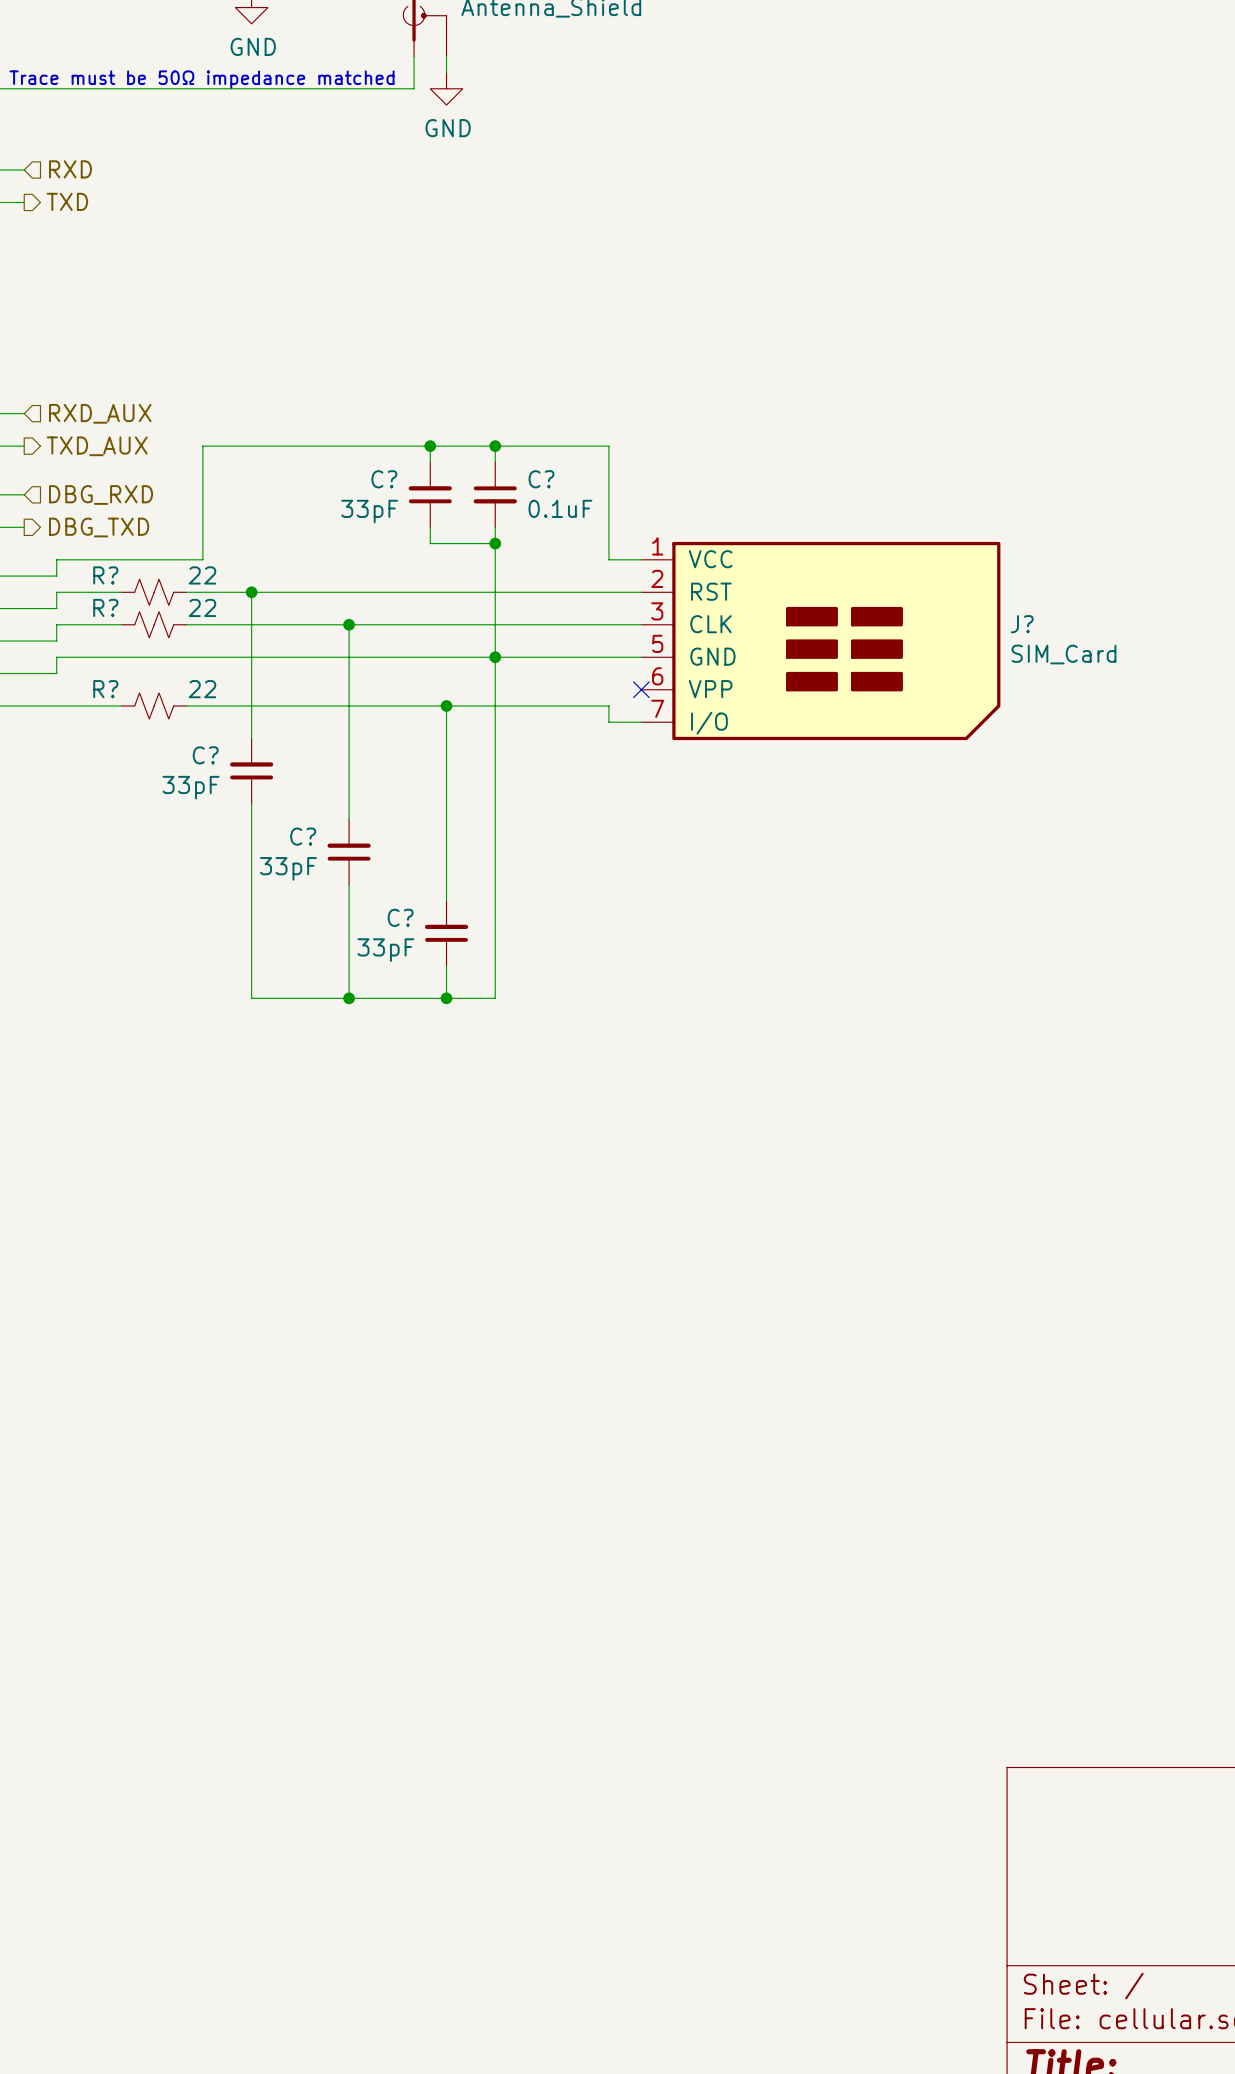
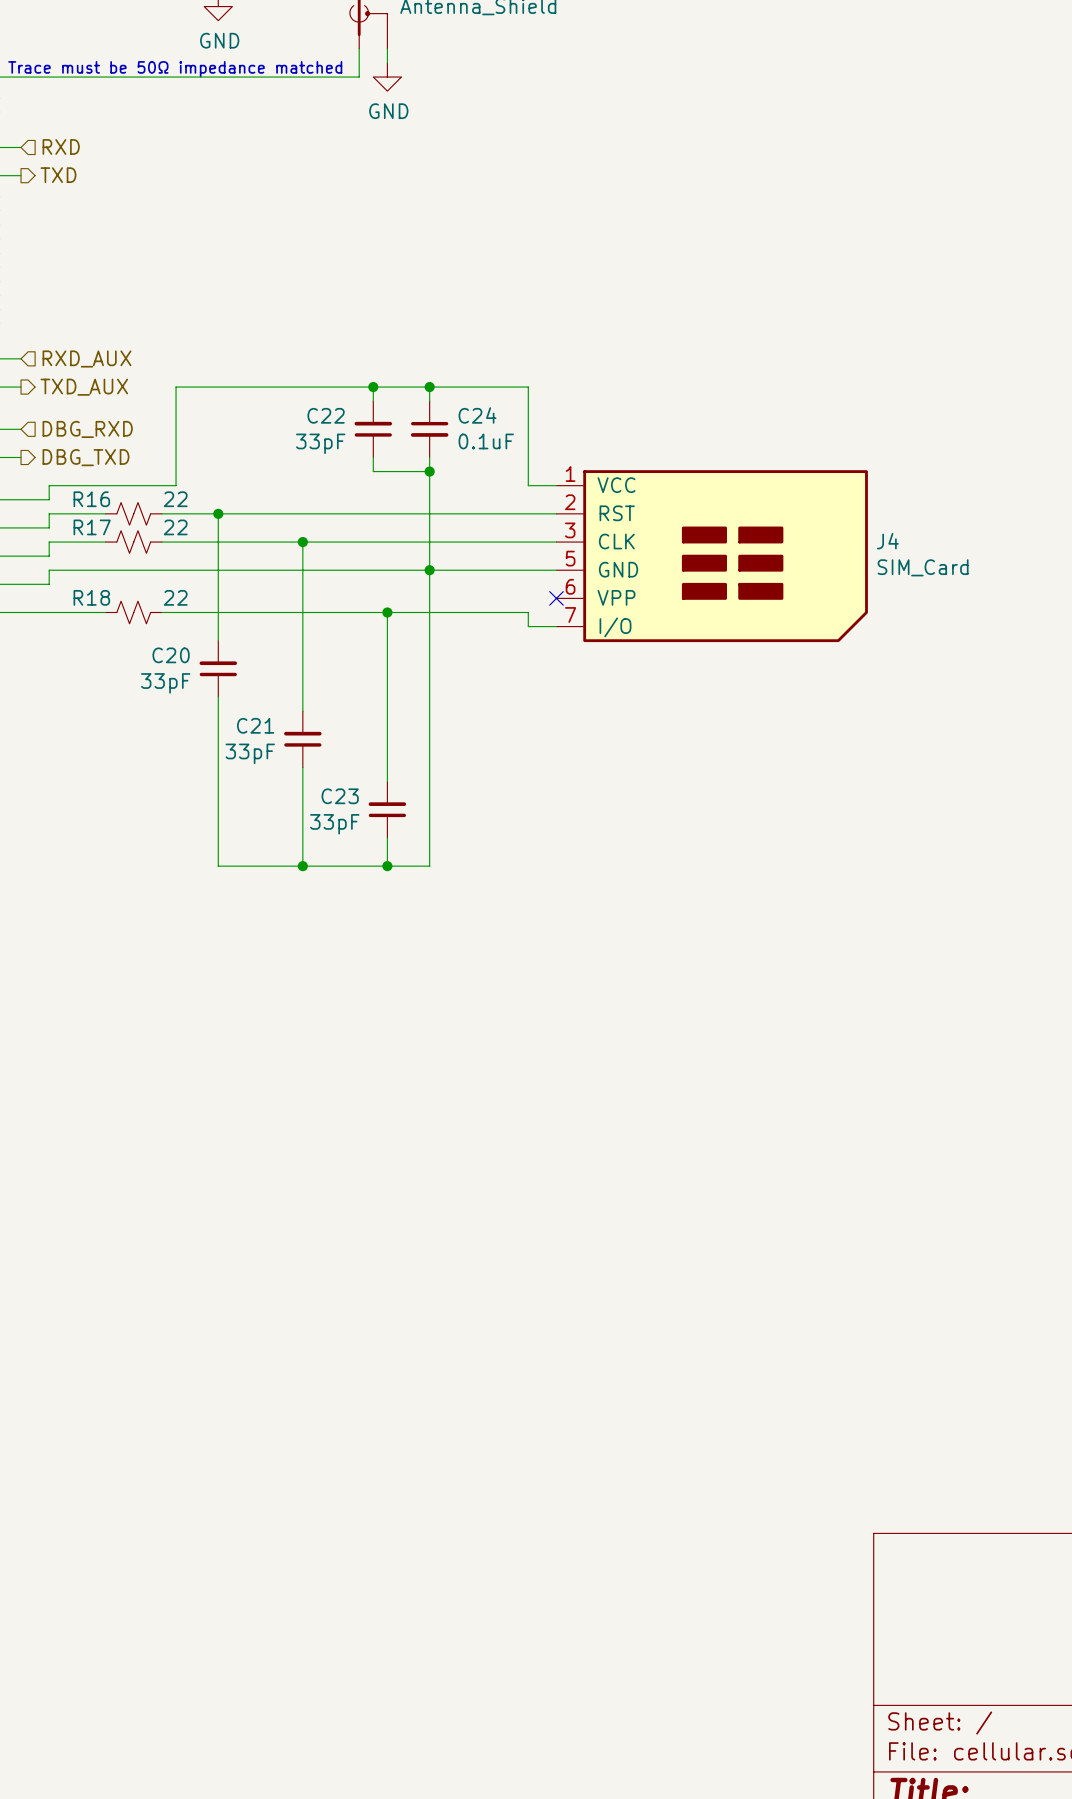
C? name: C? (384, 479) -> C22 (326, 415)
C? name: C? (541, 479) -> C24 (477, 415)
R? name: R? (105, 575) -> R16 (91, 499)
R? name: R? (105, 607) -> R17 (92, 527)
J? name: J? (1022, 624) -> J4 (887, 541)
R? name: R? (105, 689) -> R18 (91, 597)
C? name: C? (205, 755) -> C20 (171, 655)
C? name: C? (303, 836) -> C21 (255, 725)
C? name: C? (400, 917) -> C23 (340, 796)

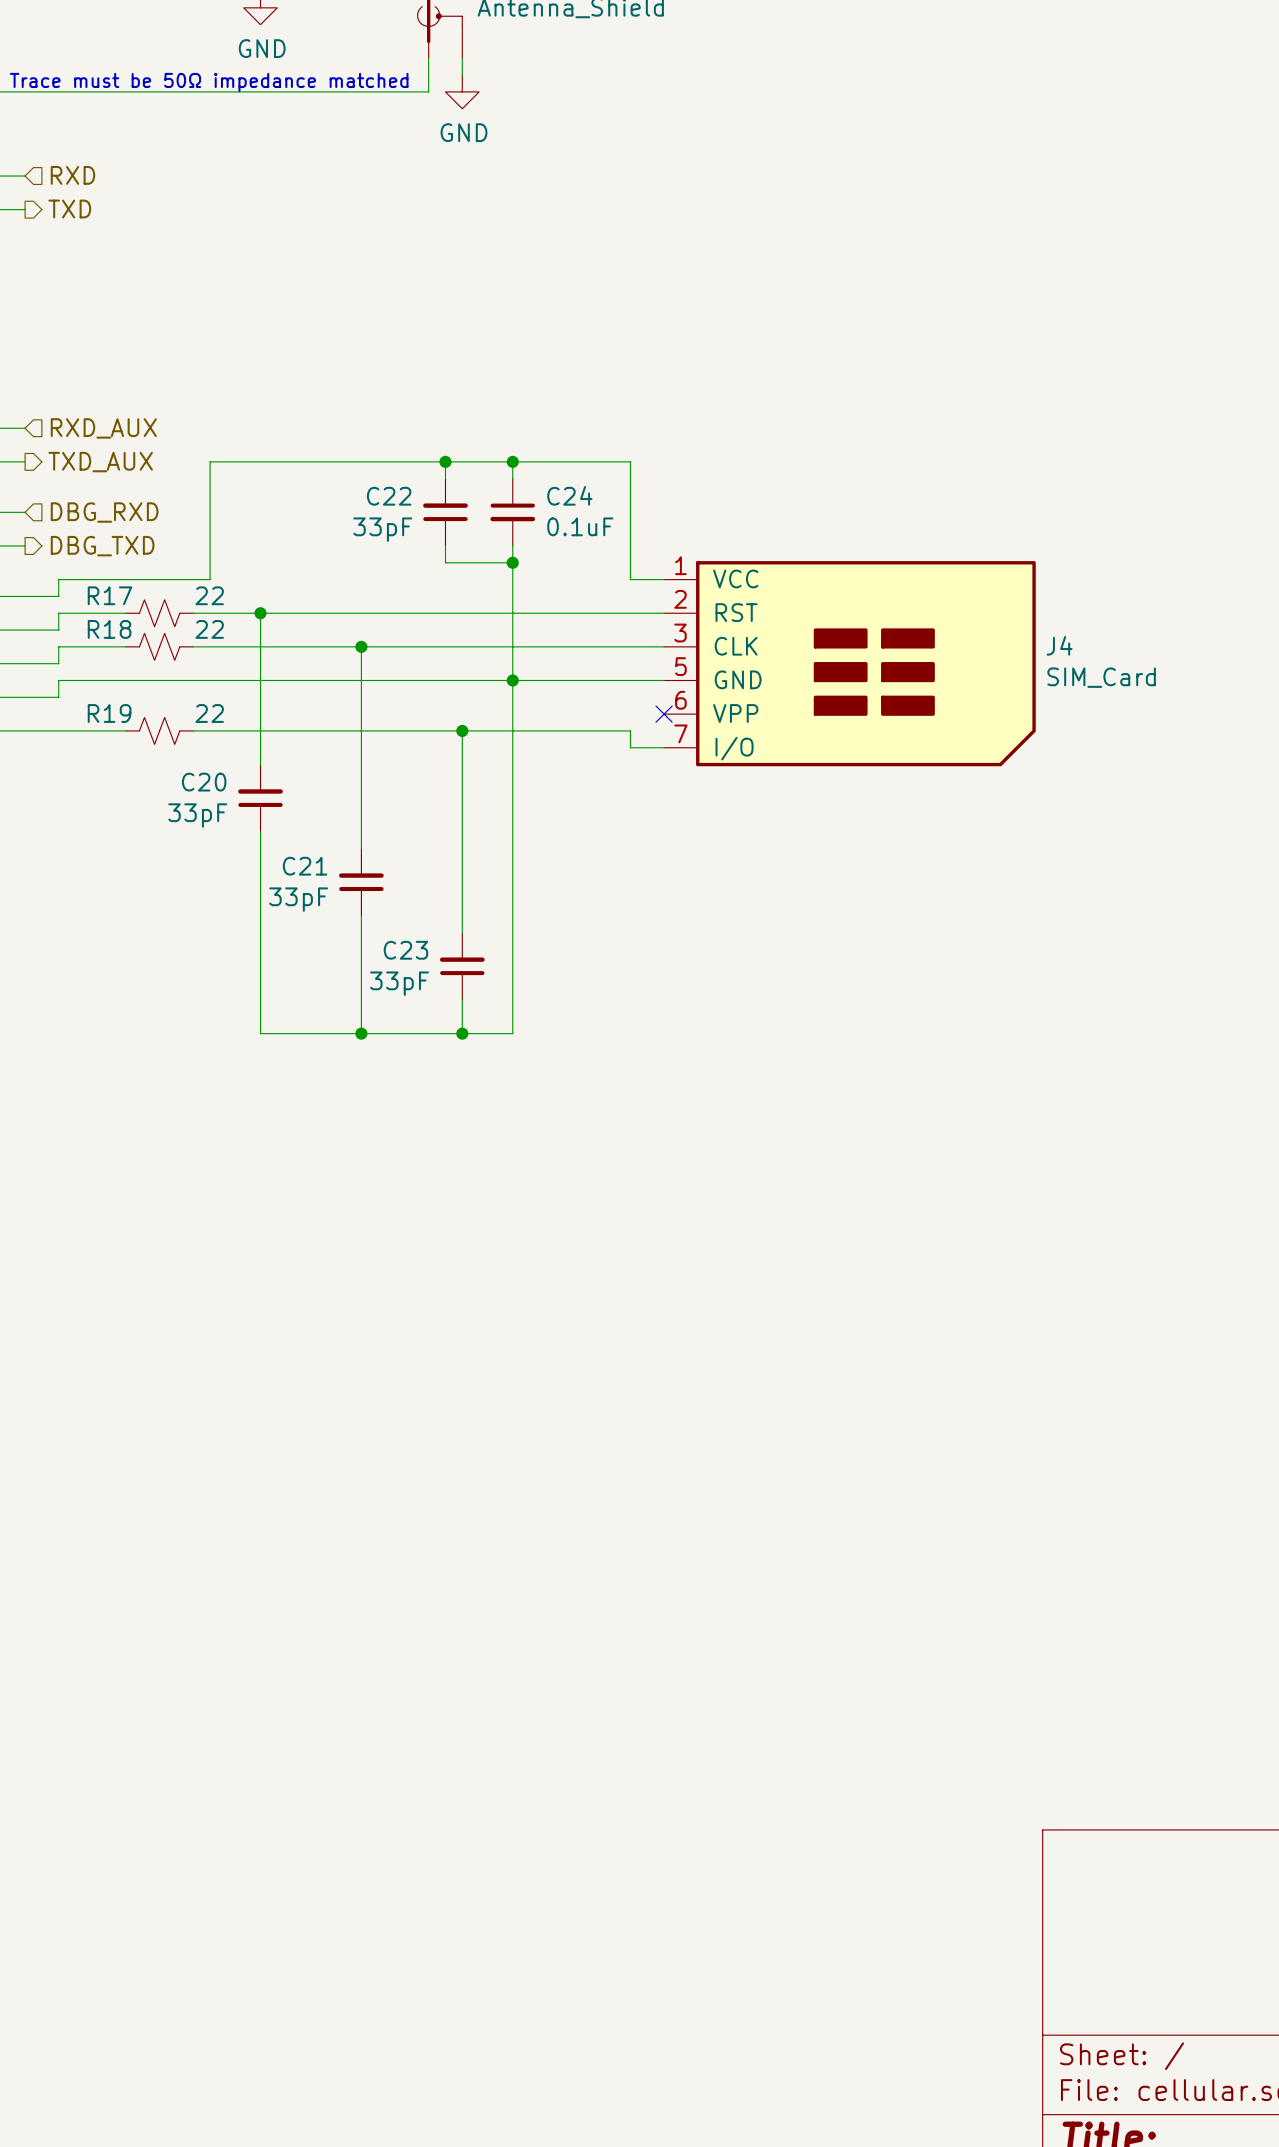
R16 name: R16 (91, 499) -> R17 (109, 595)
R17 name: R17 (92, 527) -> R18 (109, 629)
R18 name: R18 (91, 597) -> R19 (109, 713)

